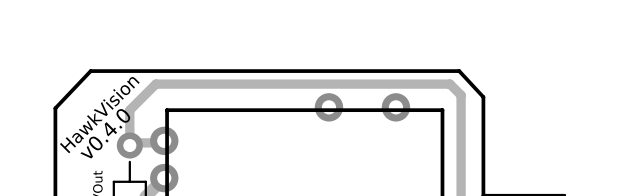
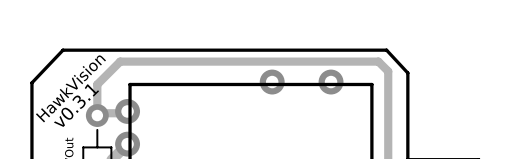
text: v0.4.0 (105, 133) -> v0.3.1 (76, 105)

